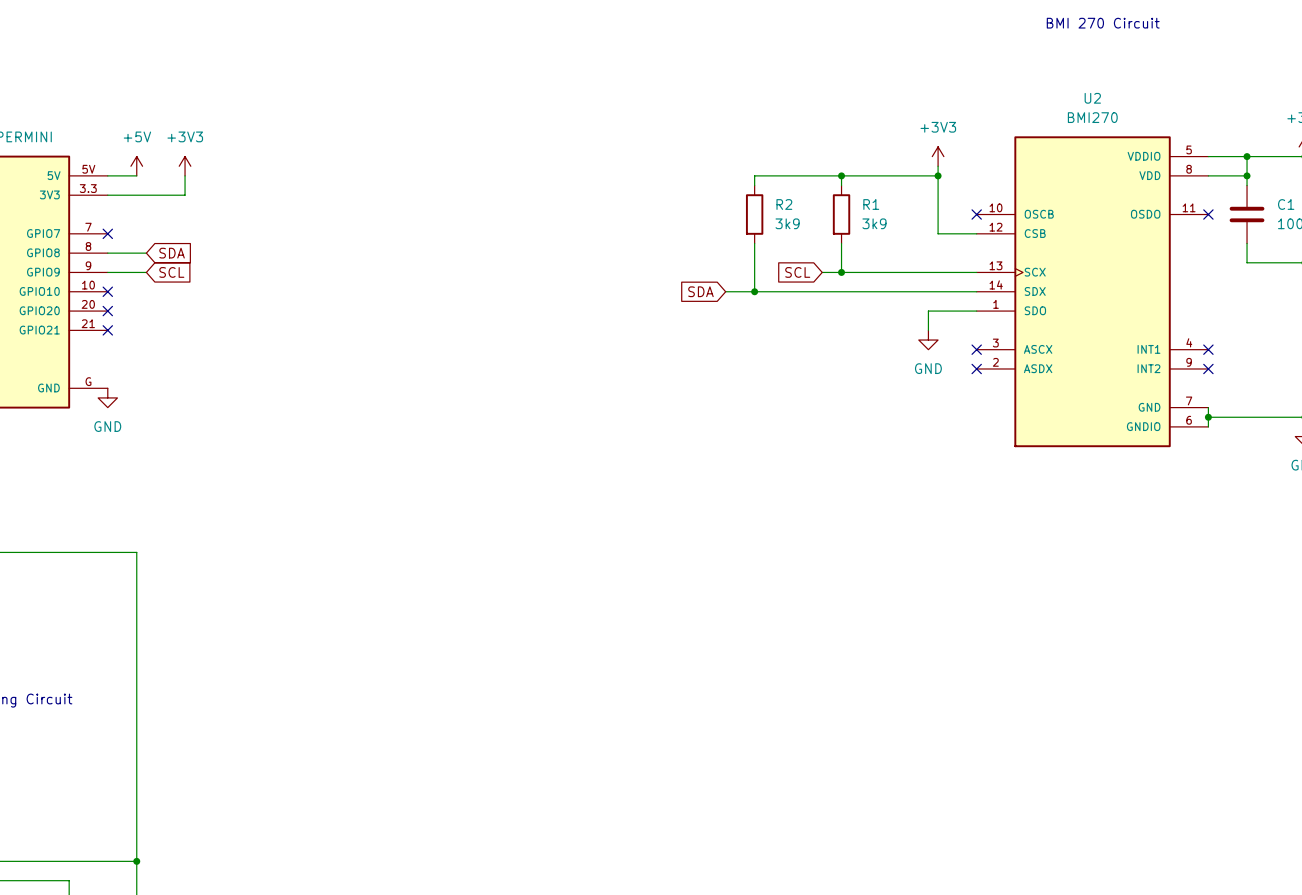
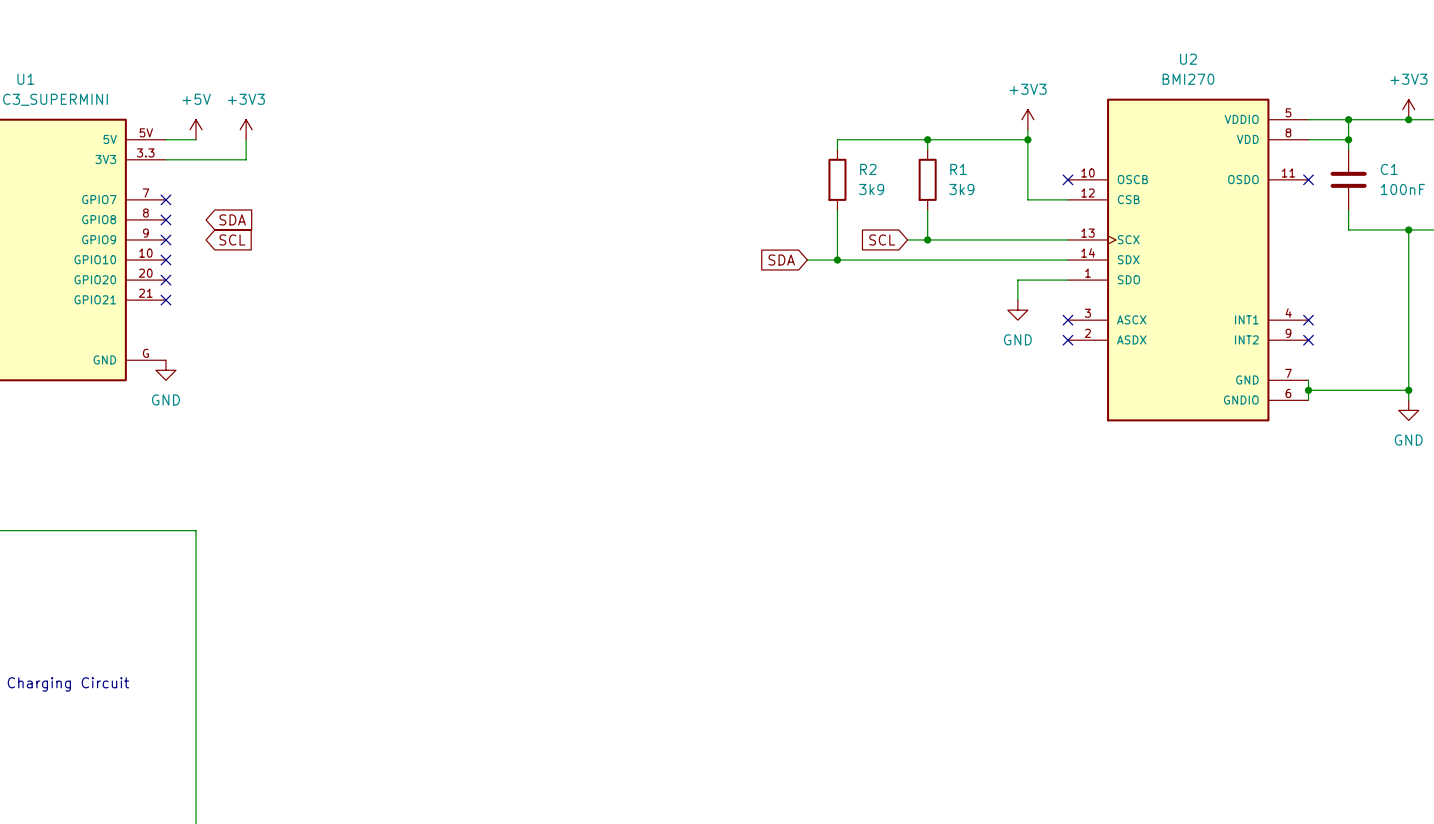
wire: (107, 253) (146, 253) -> none
no-connect mark: none -> (165, 219)
wire: (107, 272) (146, 272) -> none
no-connect mark: none -> (165, 239)

